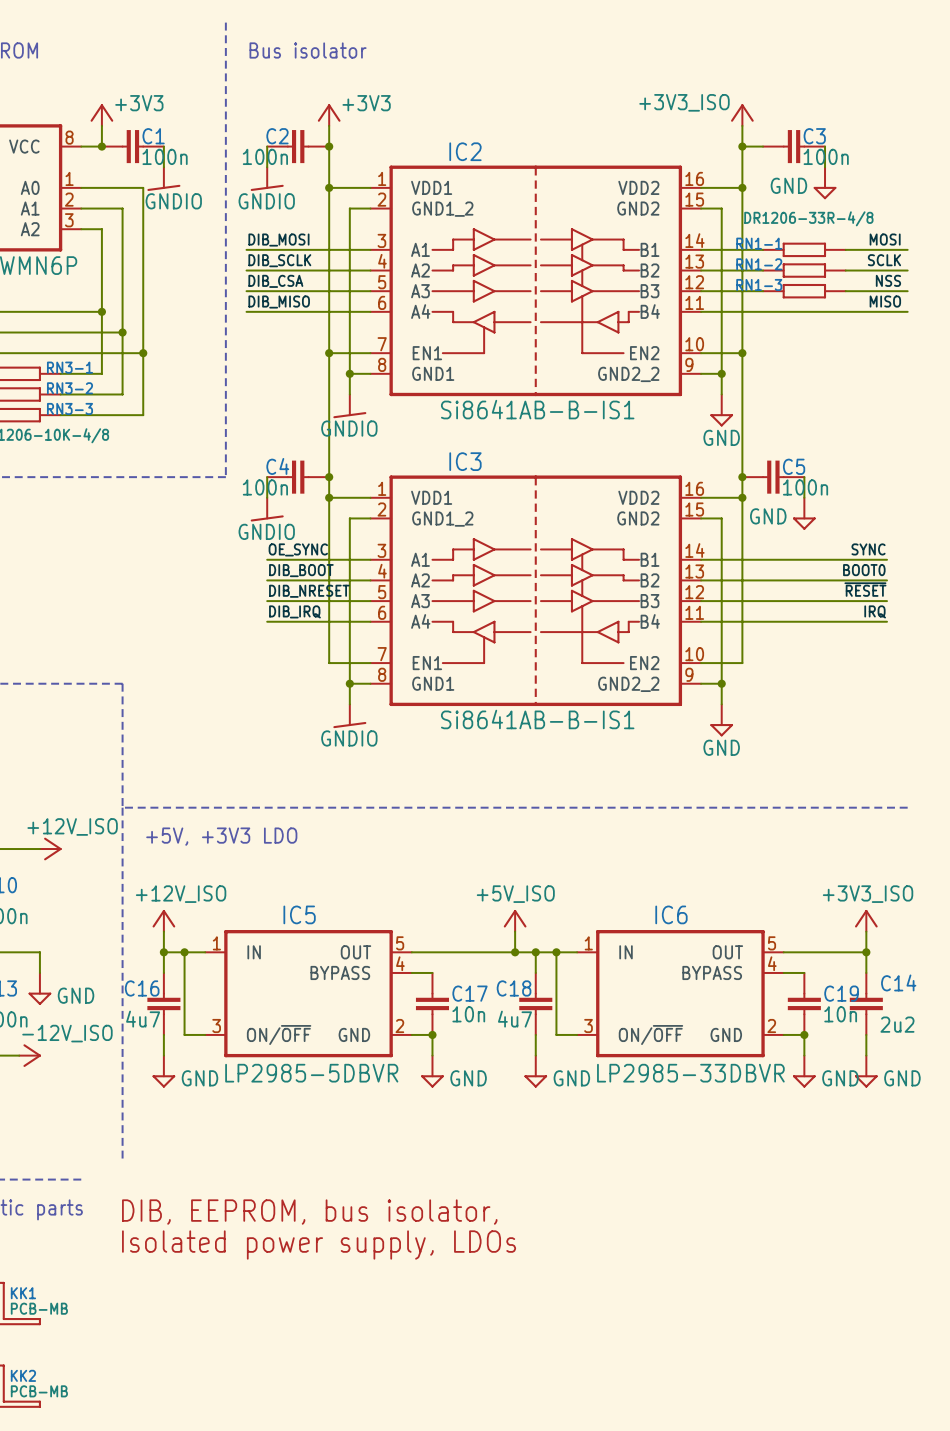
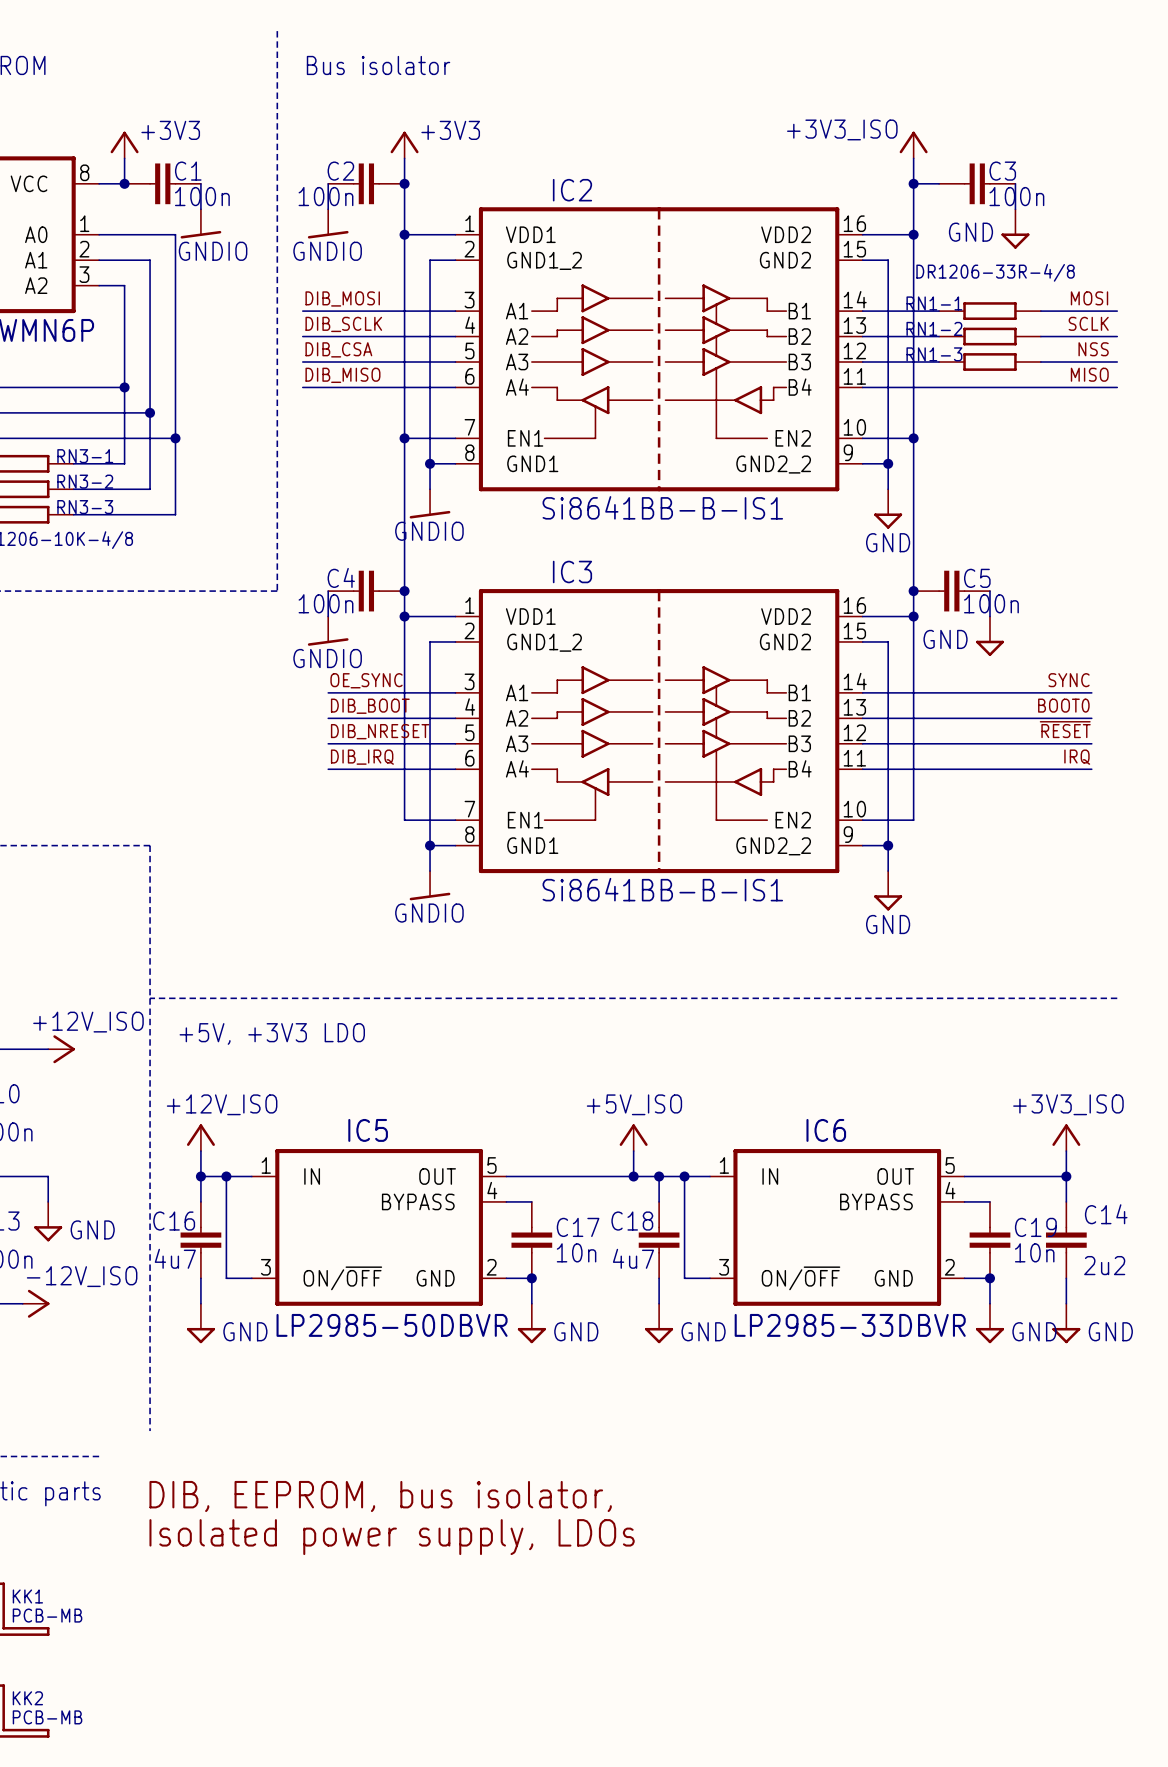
IC2 value: Si8641AB-B-IS1 (537, 409) -> Si8641BB-B-IS1 (662, 507)
IC3 value: Si8641AB-B-IS1 (537, 719) -> Si8641BB-B-IS1 (662, 889)
IC5 value: LP2985-5DBVR (311, 1073) -> LP2985-50DBVR (392, 1325)

